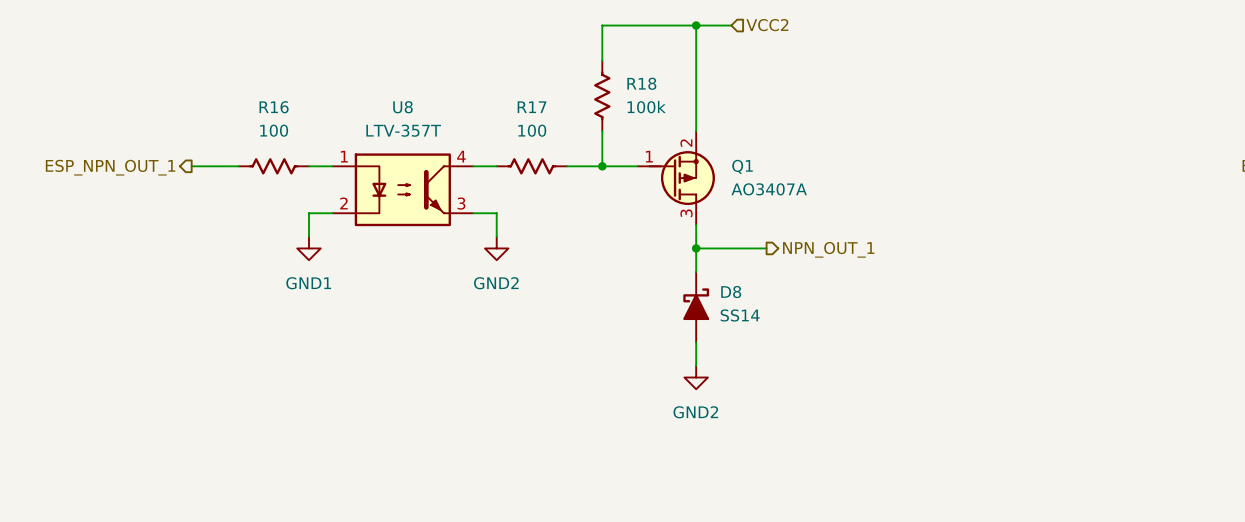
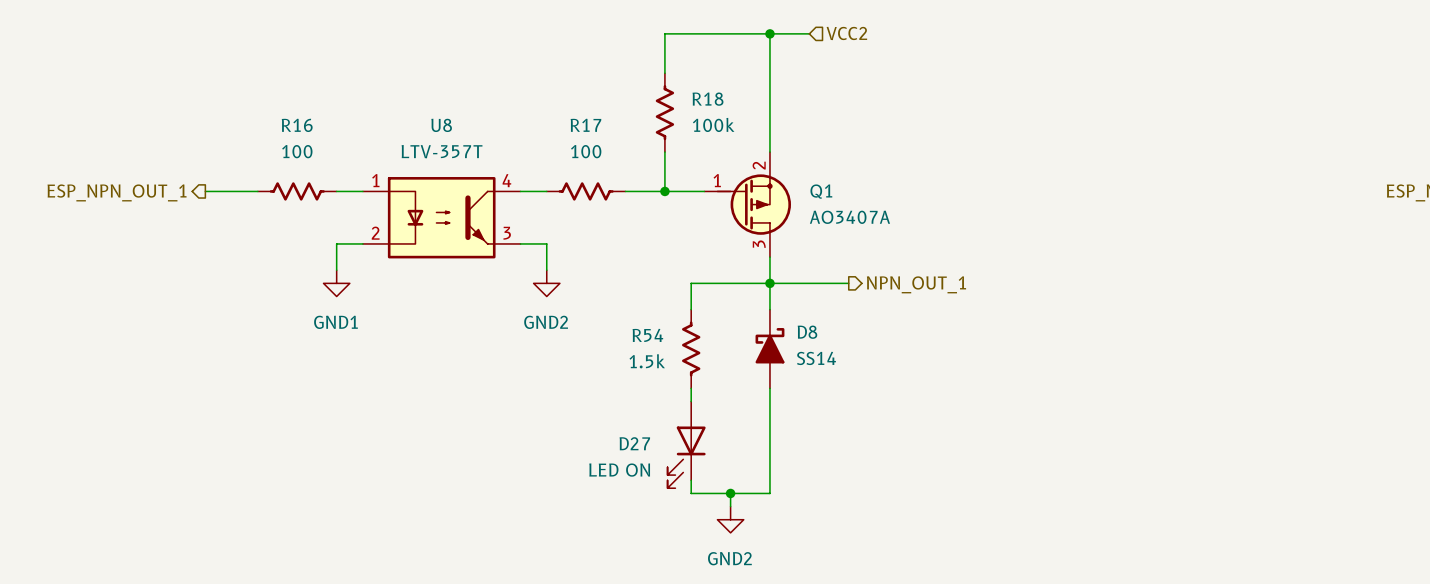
wire: none -> (769, 283) (691, 283) (691, 309)
R54: none -> 1.5k (691, 349)
wire: none -> (691, 388) (691, 401)
wire: none -> (769, 414) (769, 493) (691, 493) (691, 480)
power symbol position: GND2 (696, 377) -> GND2 (730, 519)
D27: none -> LED ON (686, 444)
wire: none -> (730, 493) (730, 506)
junction: none -> (730, 493)

